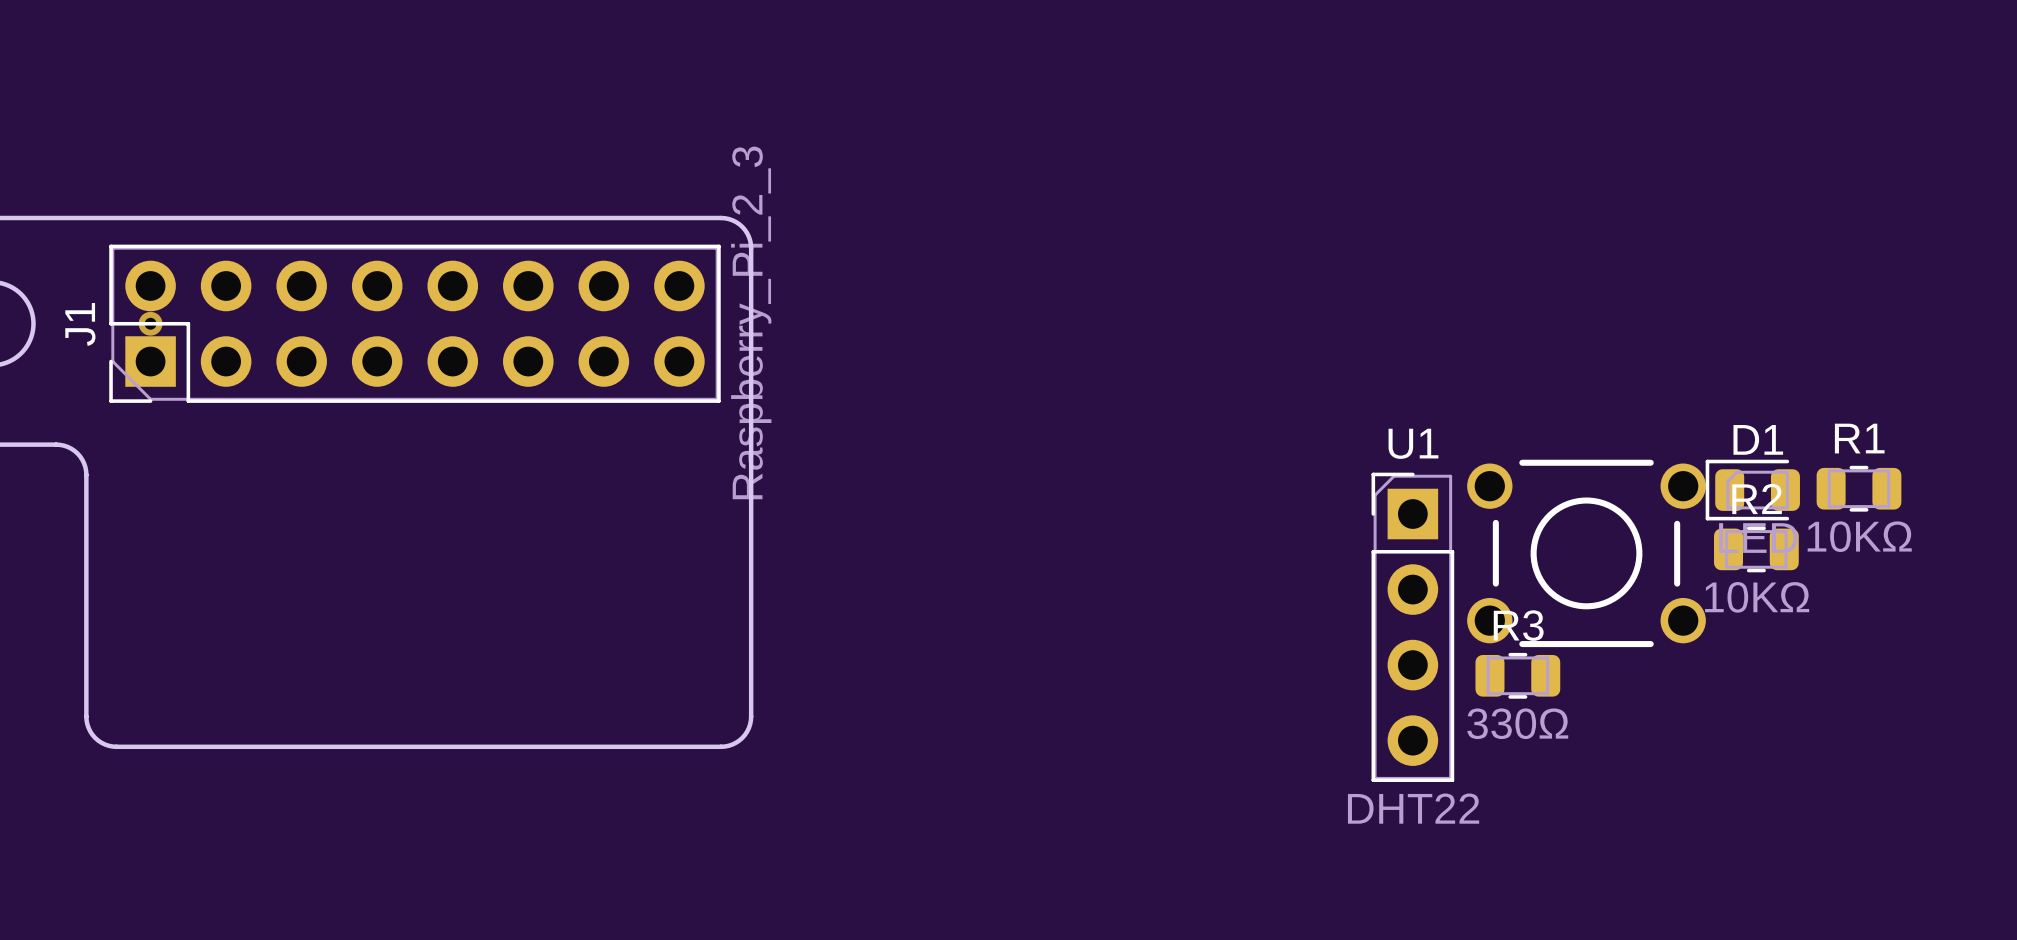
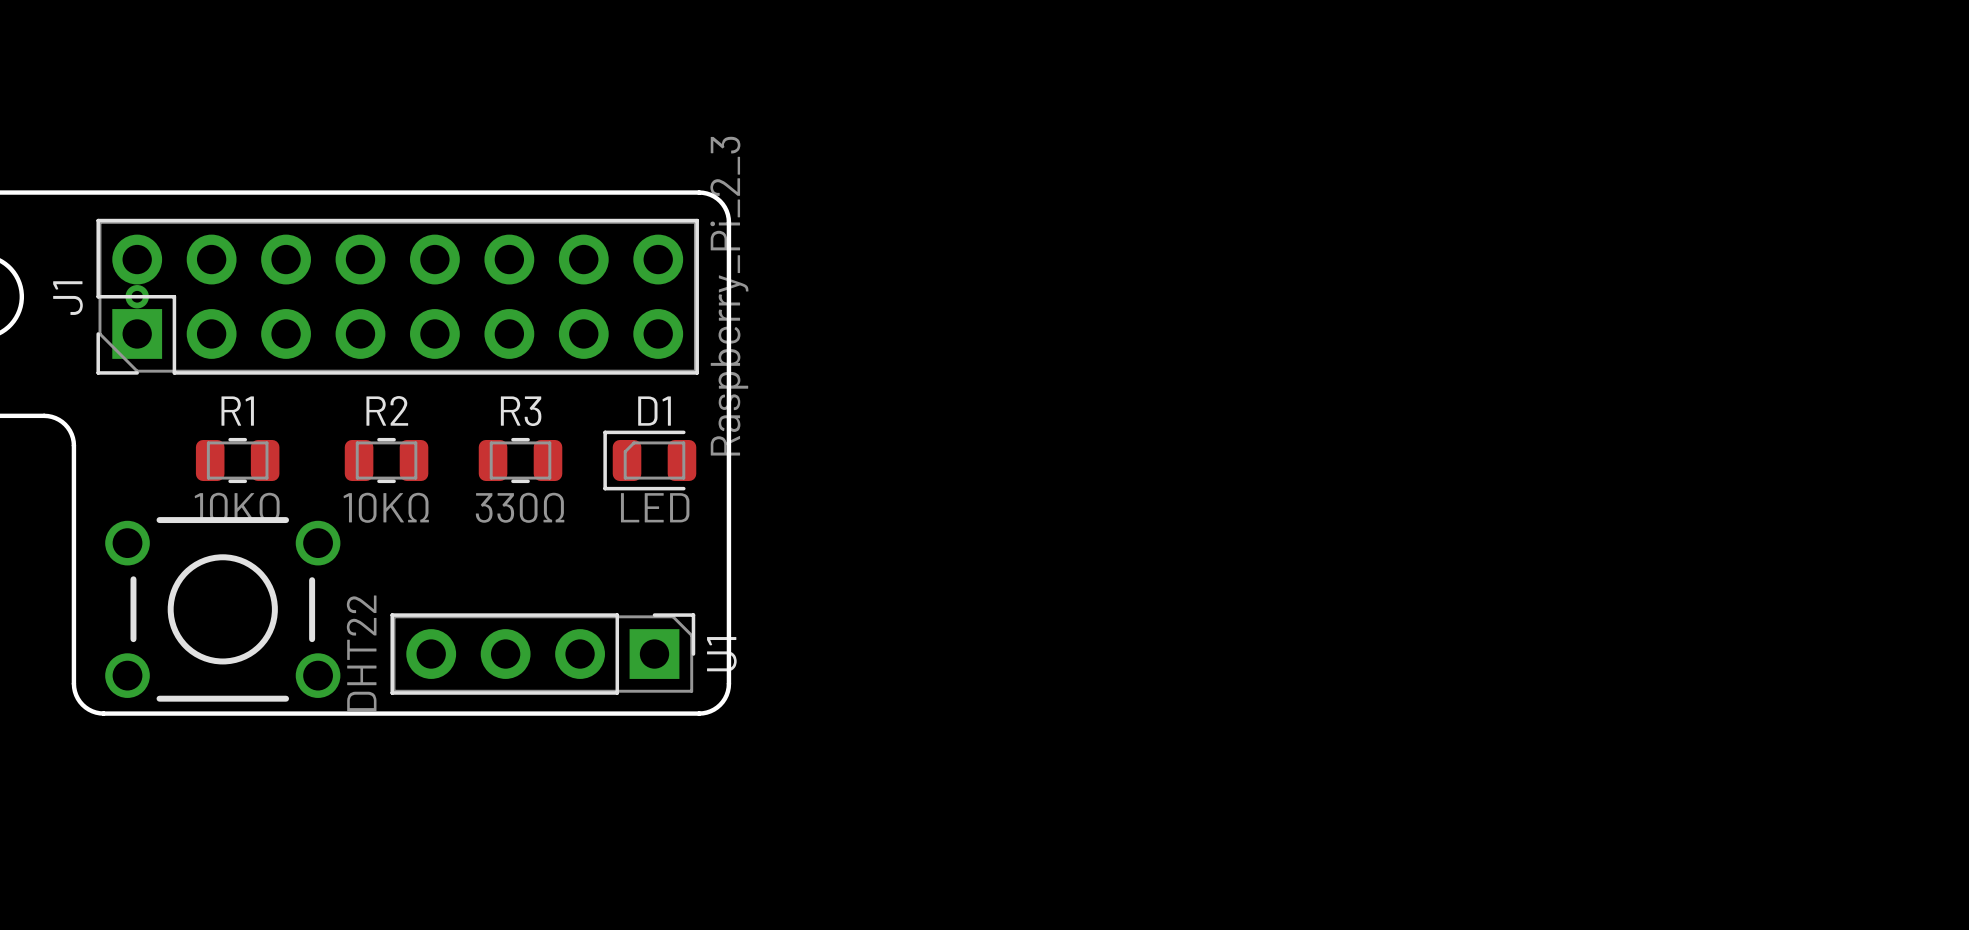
R1 position: (1859, 488) -> (237, 460)
D1 position: (1752, 490) -> (649, 460)
R2 position: (1756, 549) -> (386, 460)
part: (1586, 553) -> none
U1 rotation: 0° (1412, 627) -> 90° clockwise (542, 654)
U1 position: (1412, 627) -> (542, 654)
part: none -> (222, 609)
R3 position: (1517, 675) -> (520, 460)

